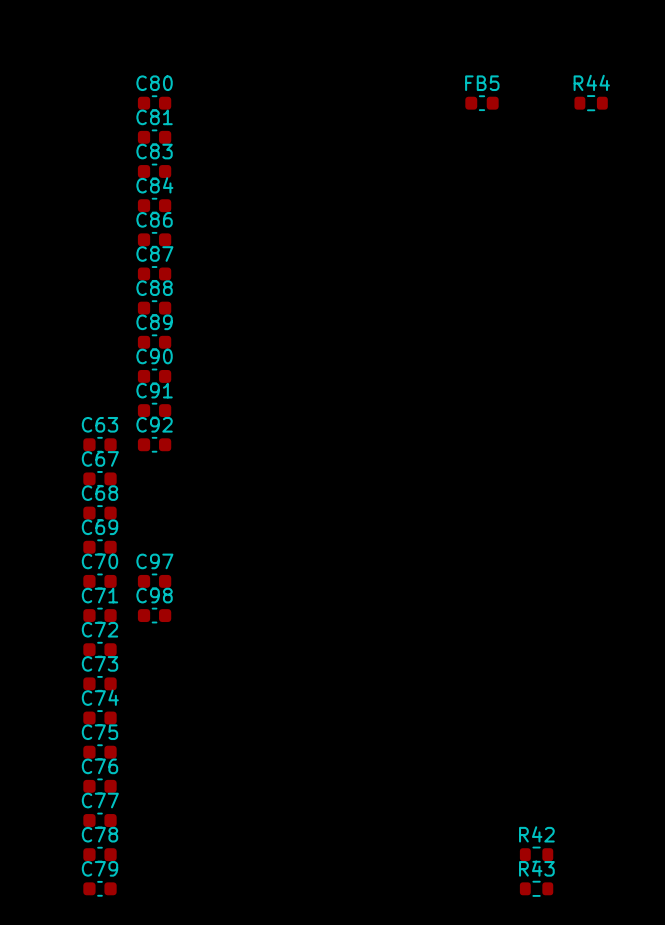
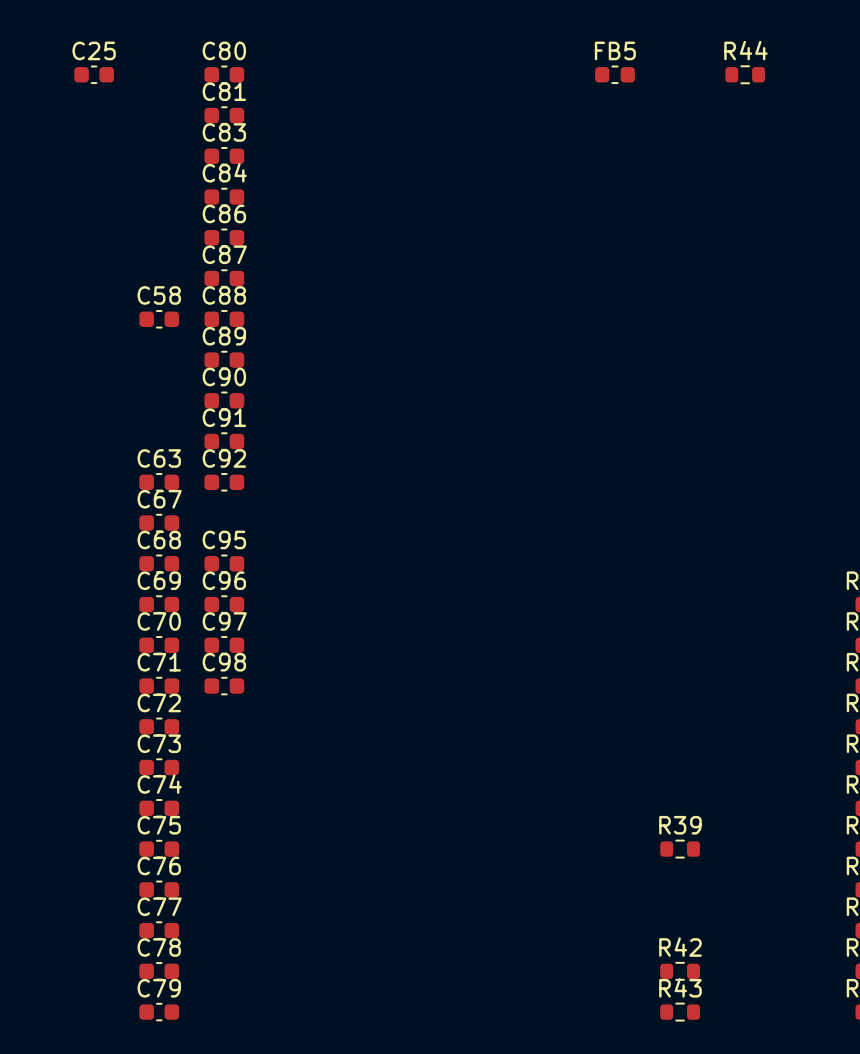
C25: none -> (94, 74)
C58: none -> (159, 319)
C95: none -> (224, 563)
C96: none -> (224, 604)
R39: none -> (680, 849)

